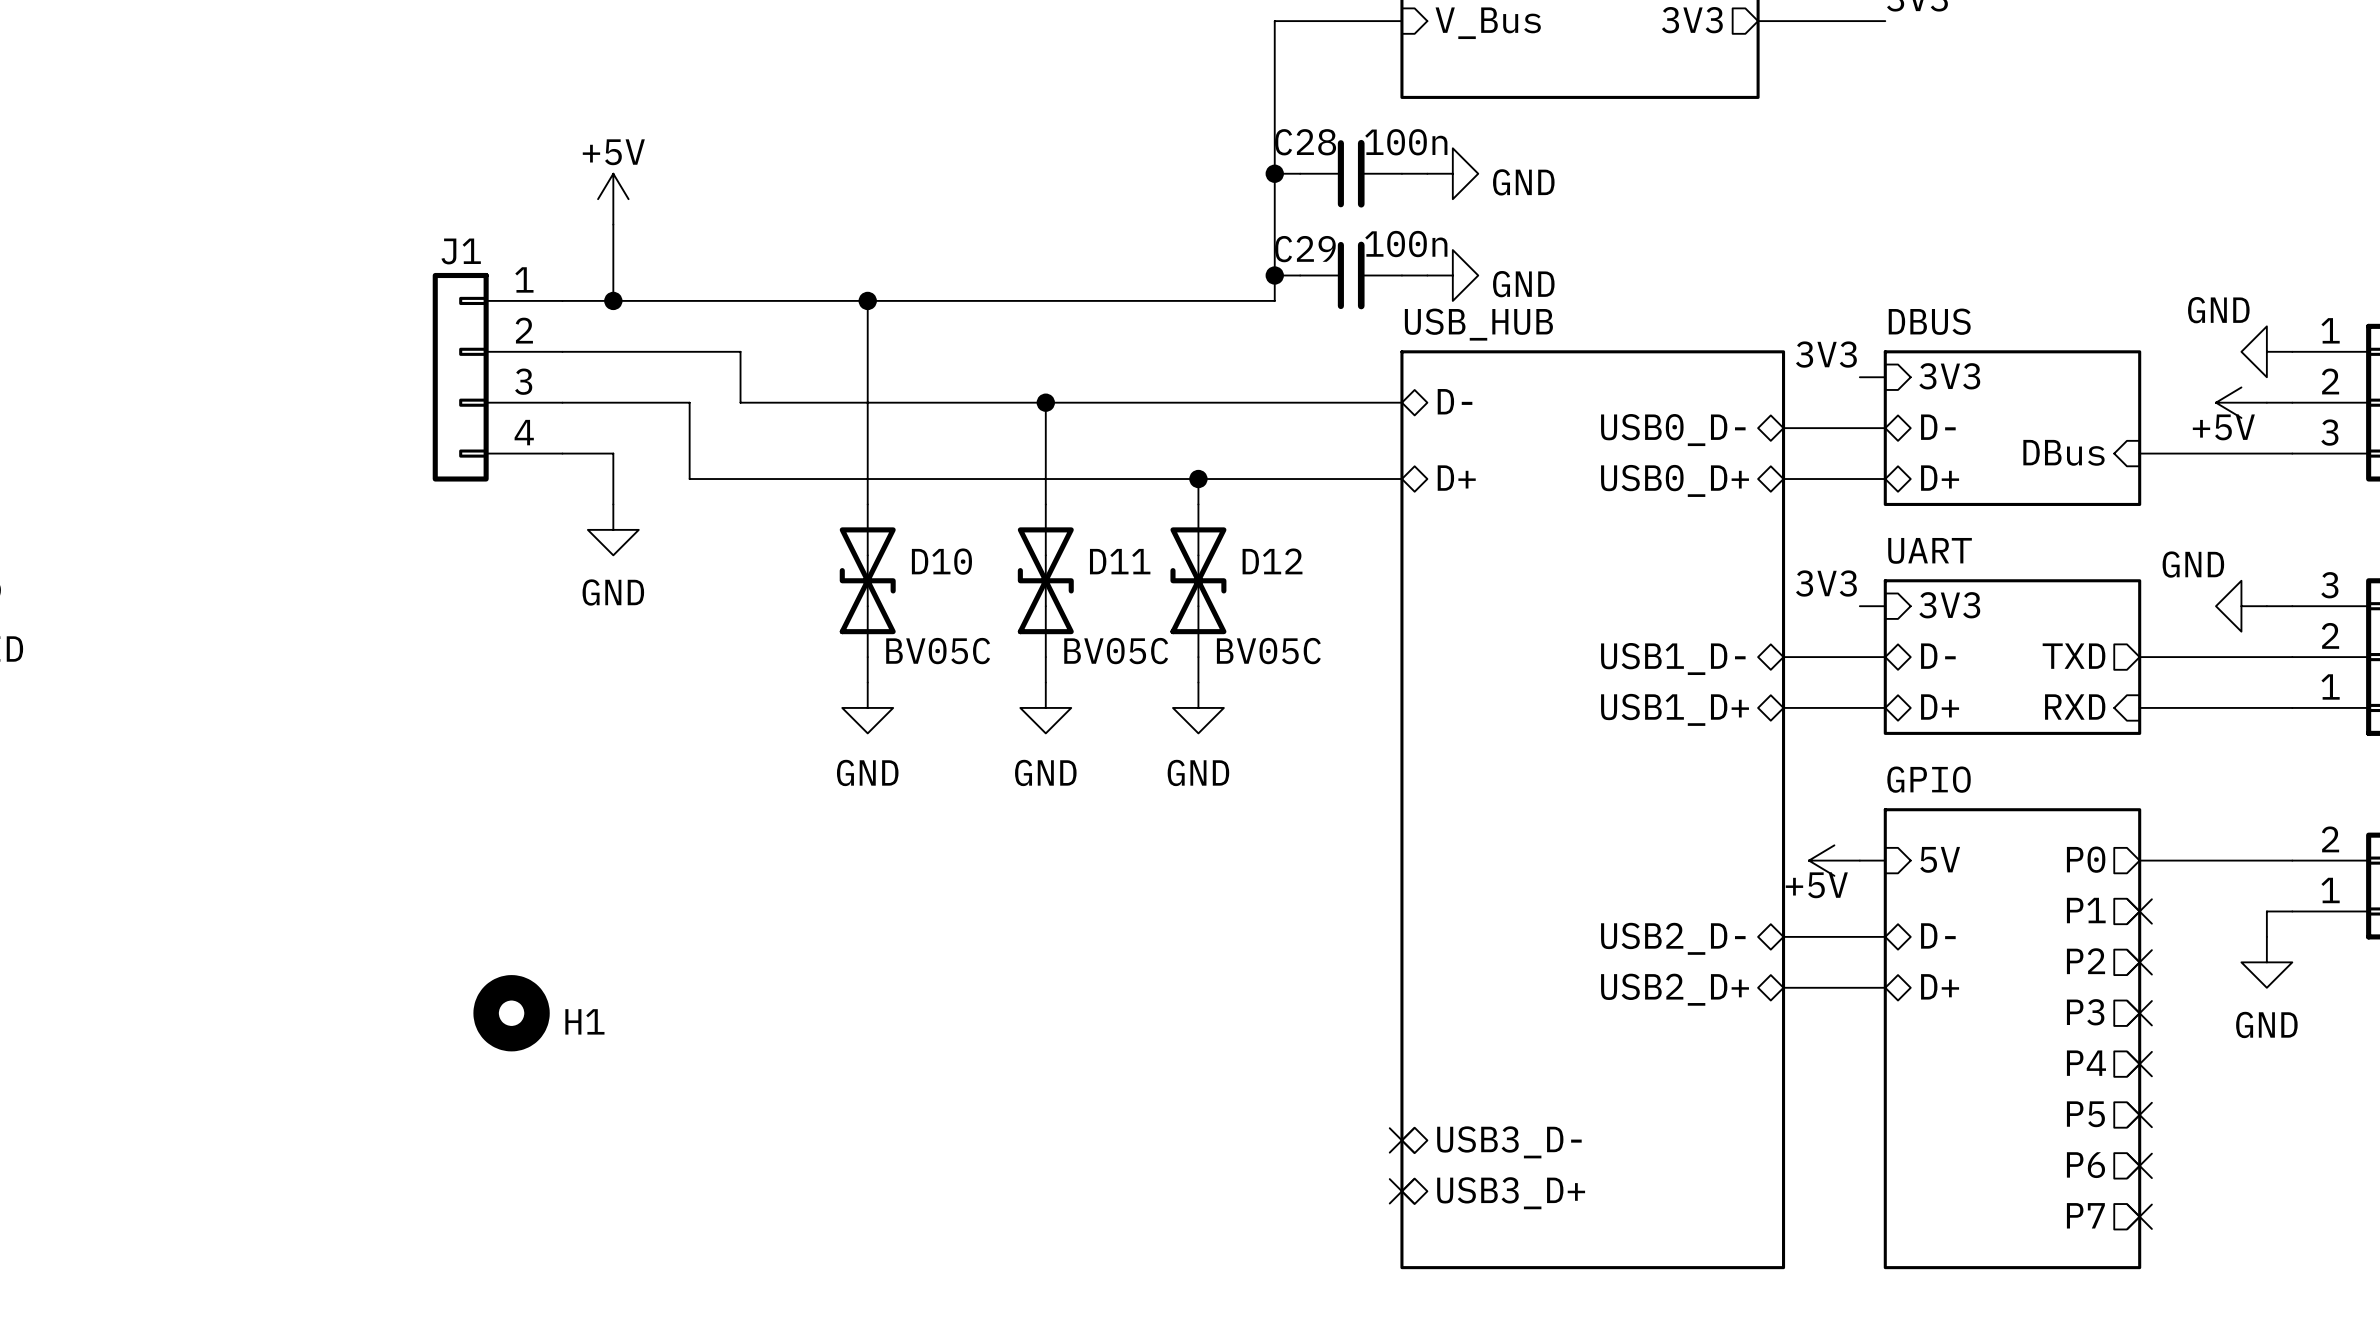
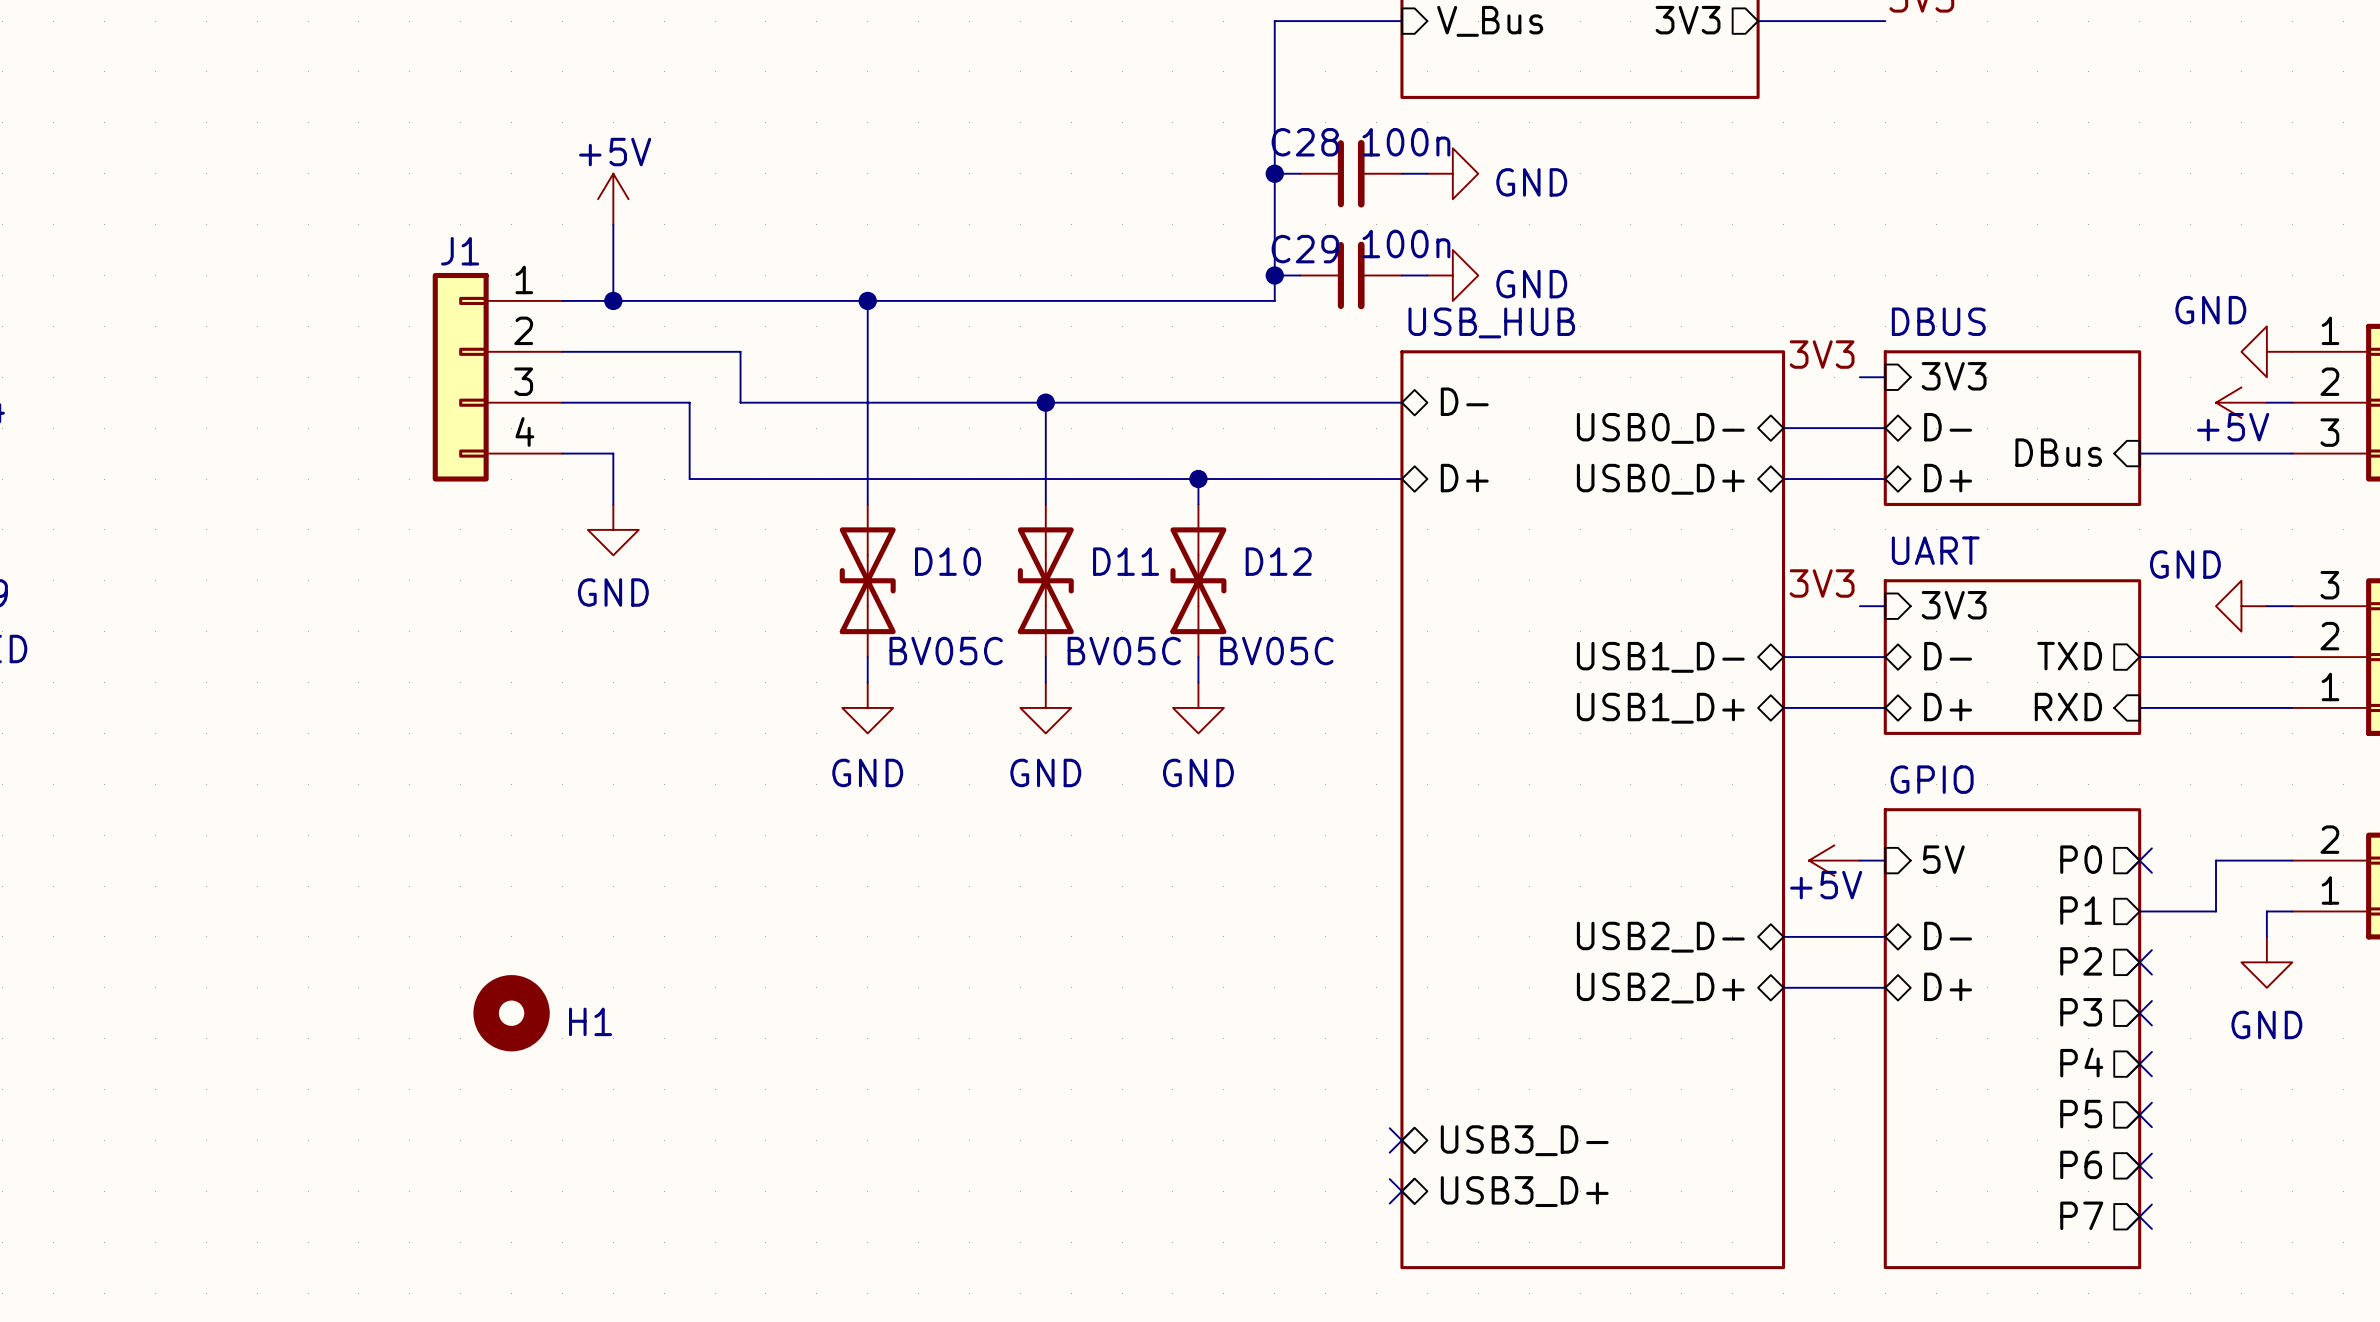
wire: (2139, 860) (2216, 860) -> (2139, 911) (2216, 911) (2216, 860)
no-connect mark position: (2139, 911) -> (2139, 860)

